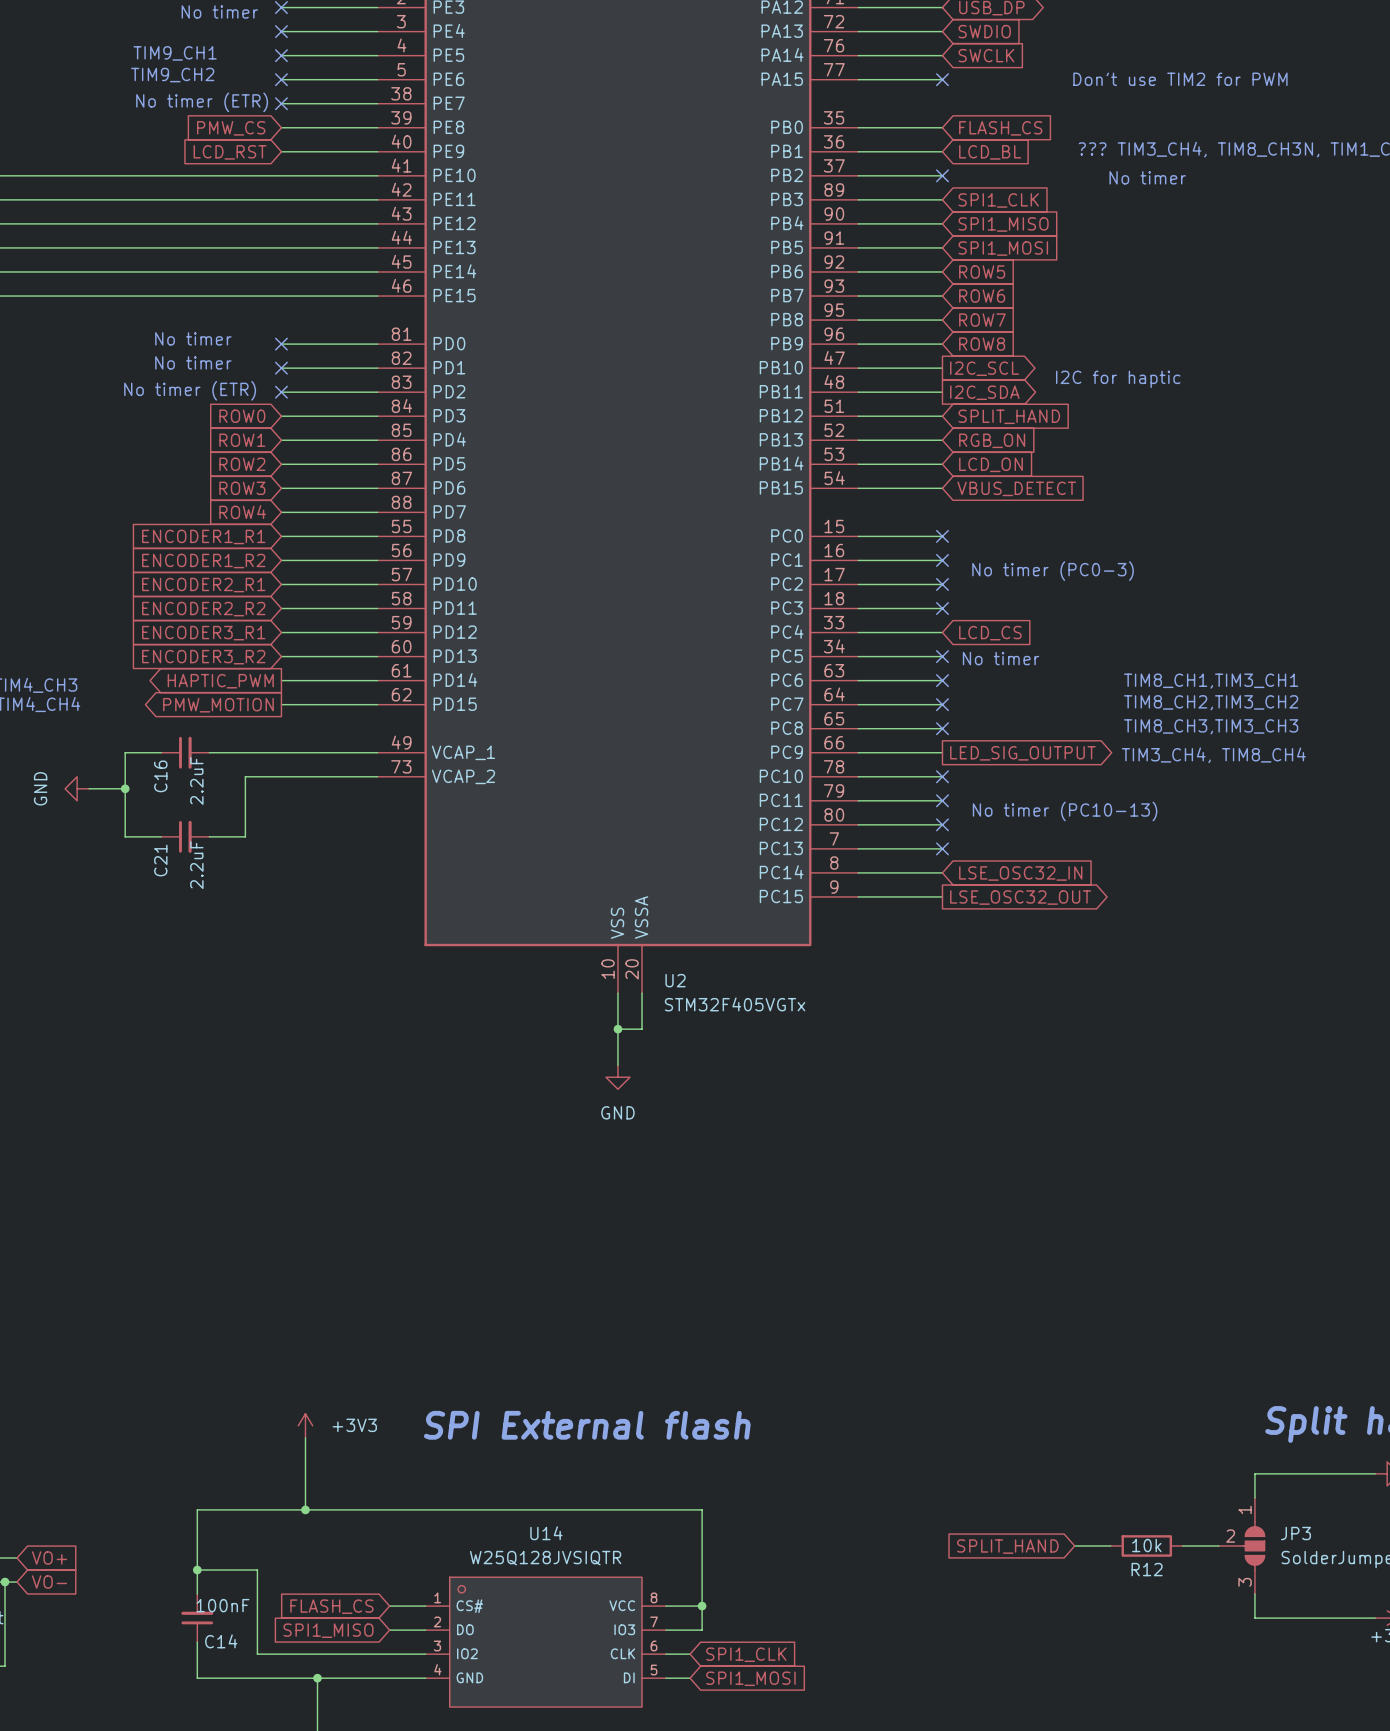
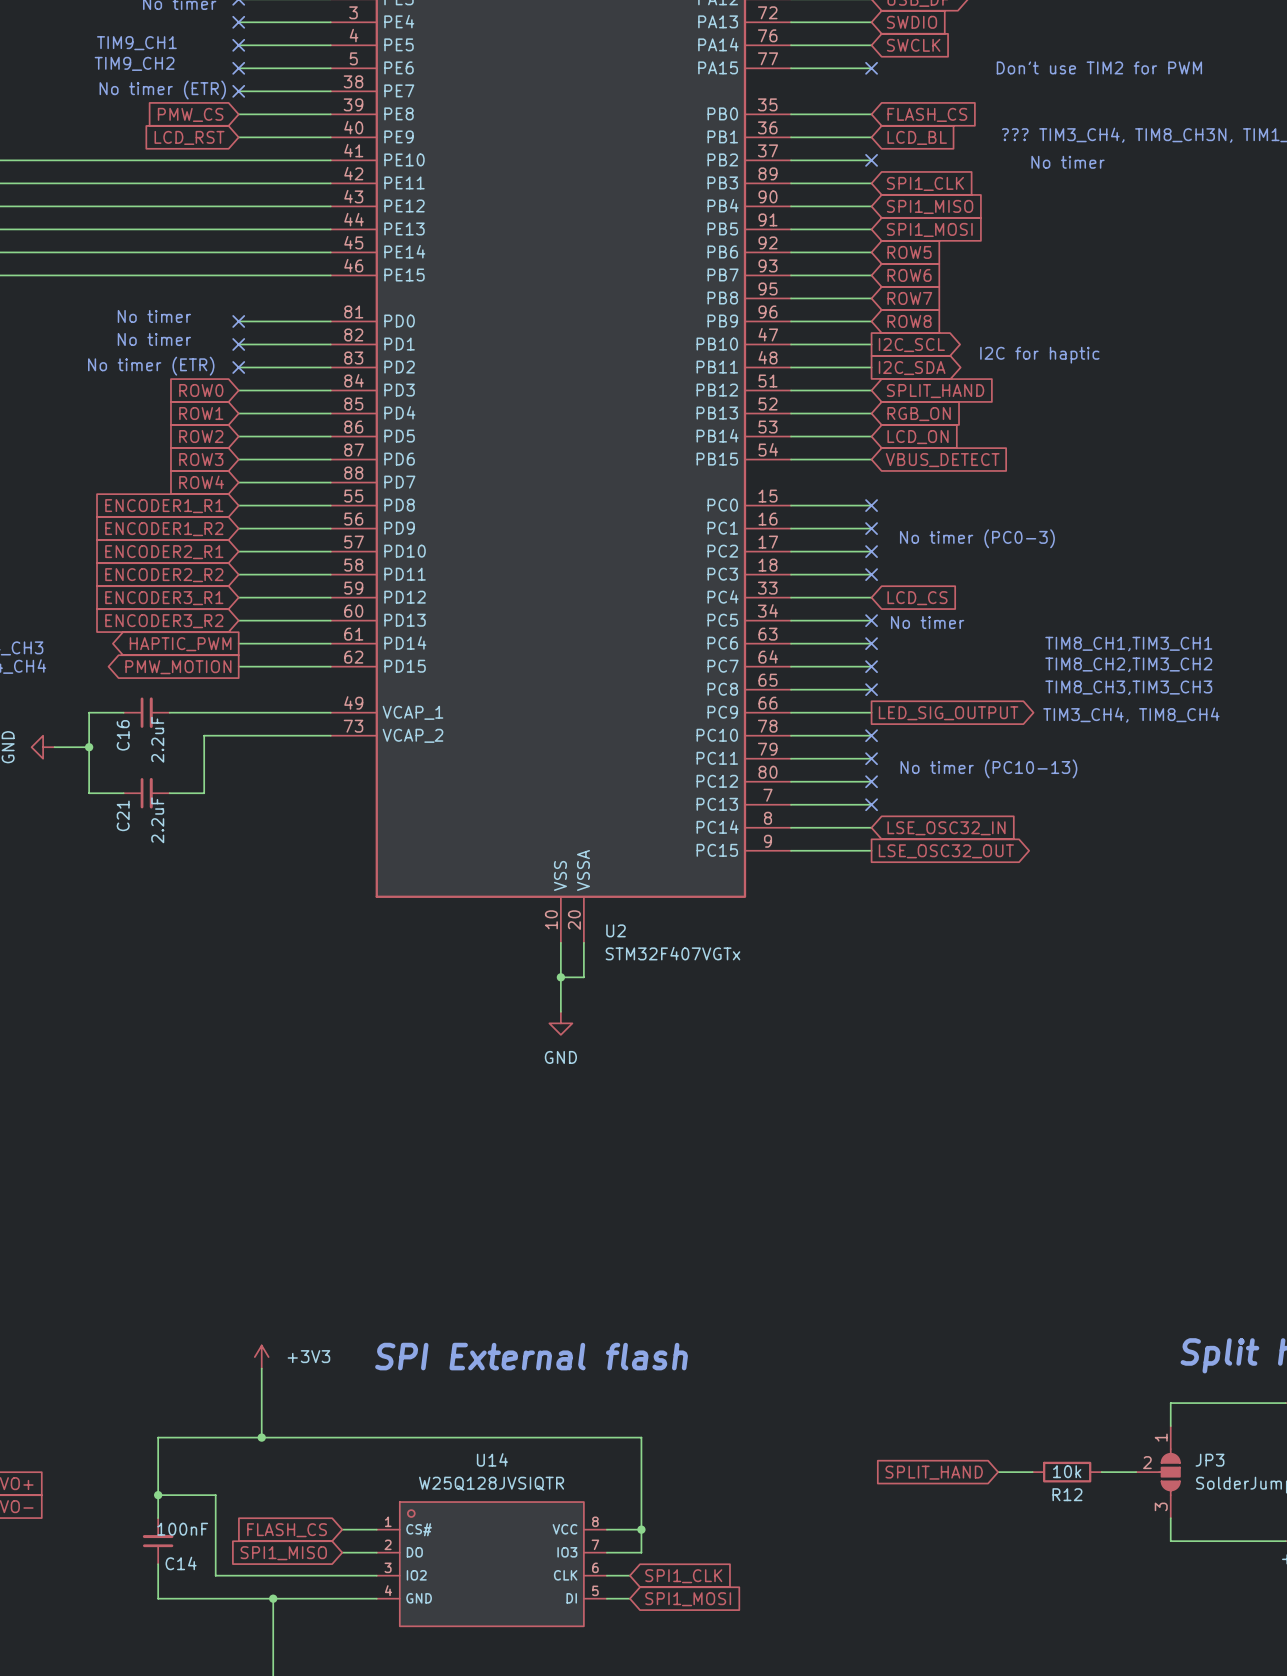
U2 value: STM32F405VGTx (735, 1004) -> STM32F407VGTx (672, 953)

